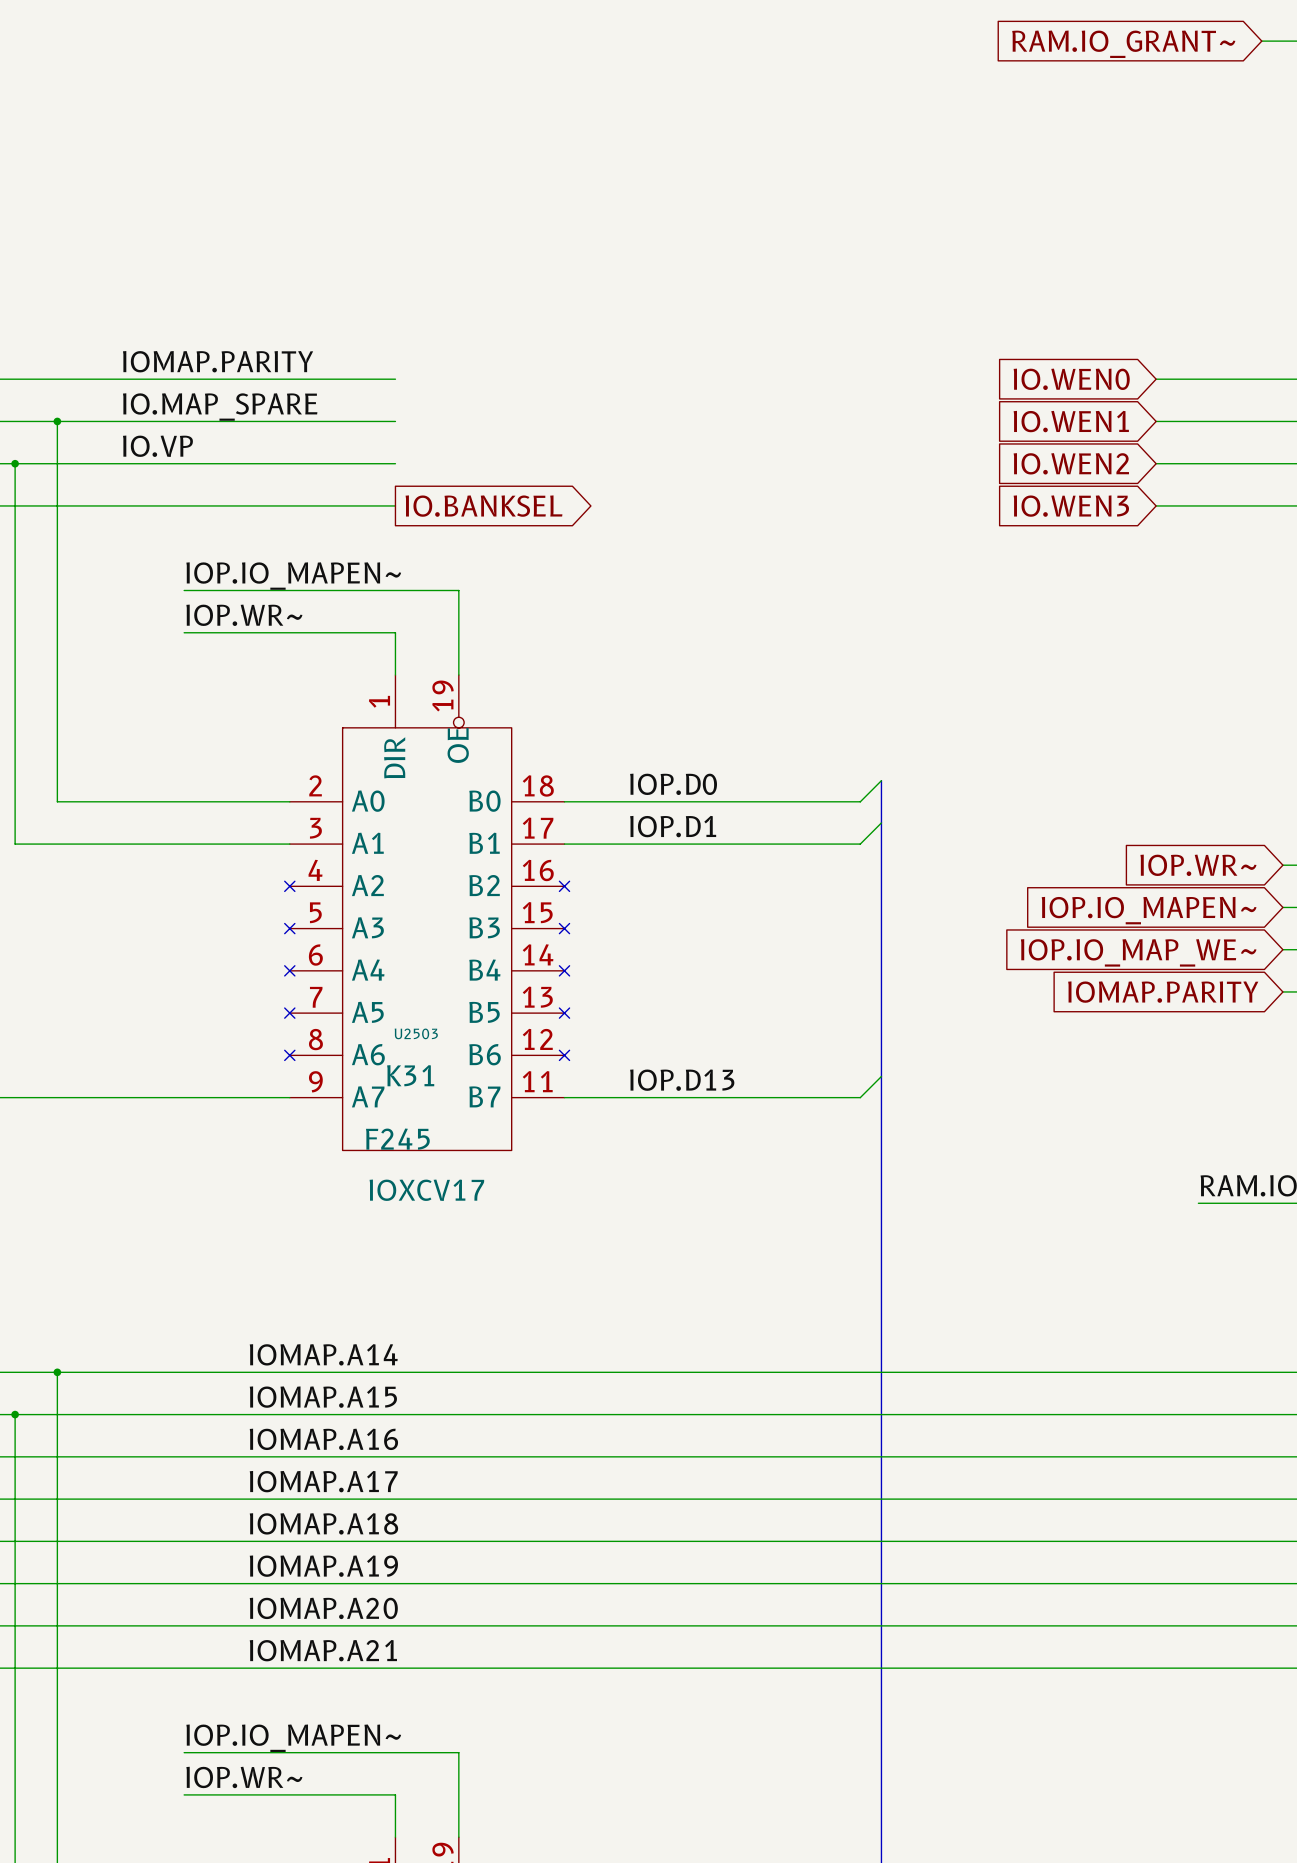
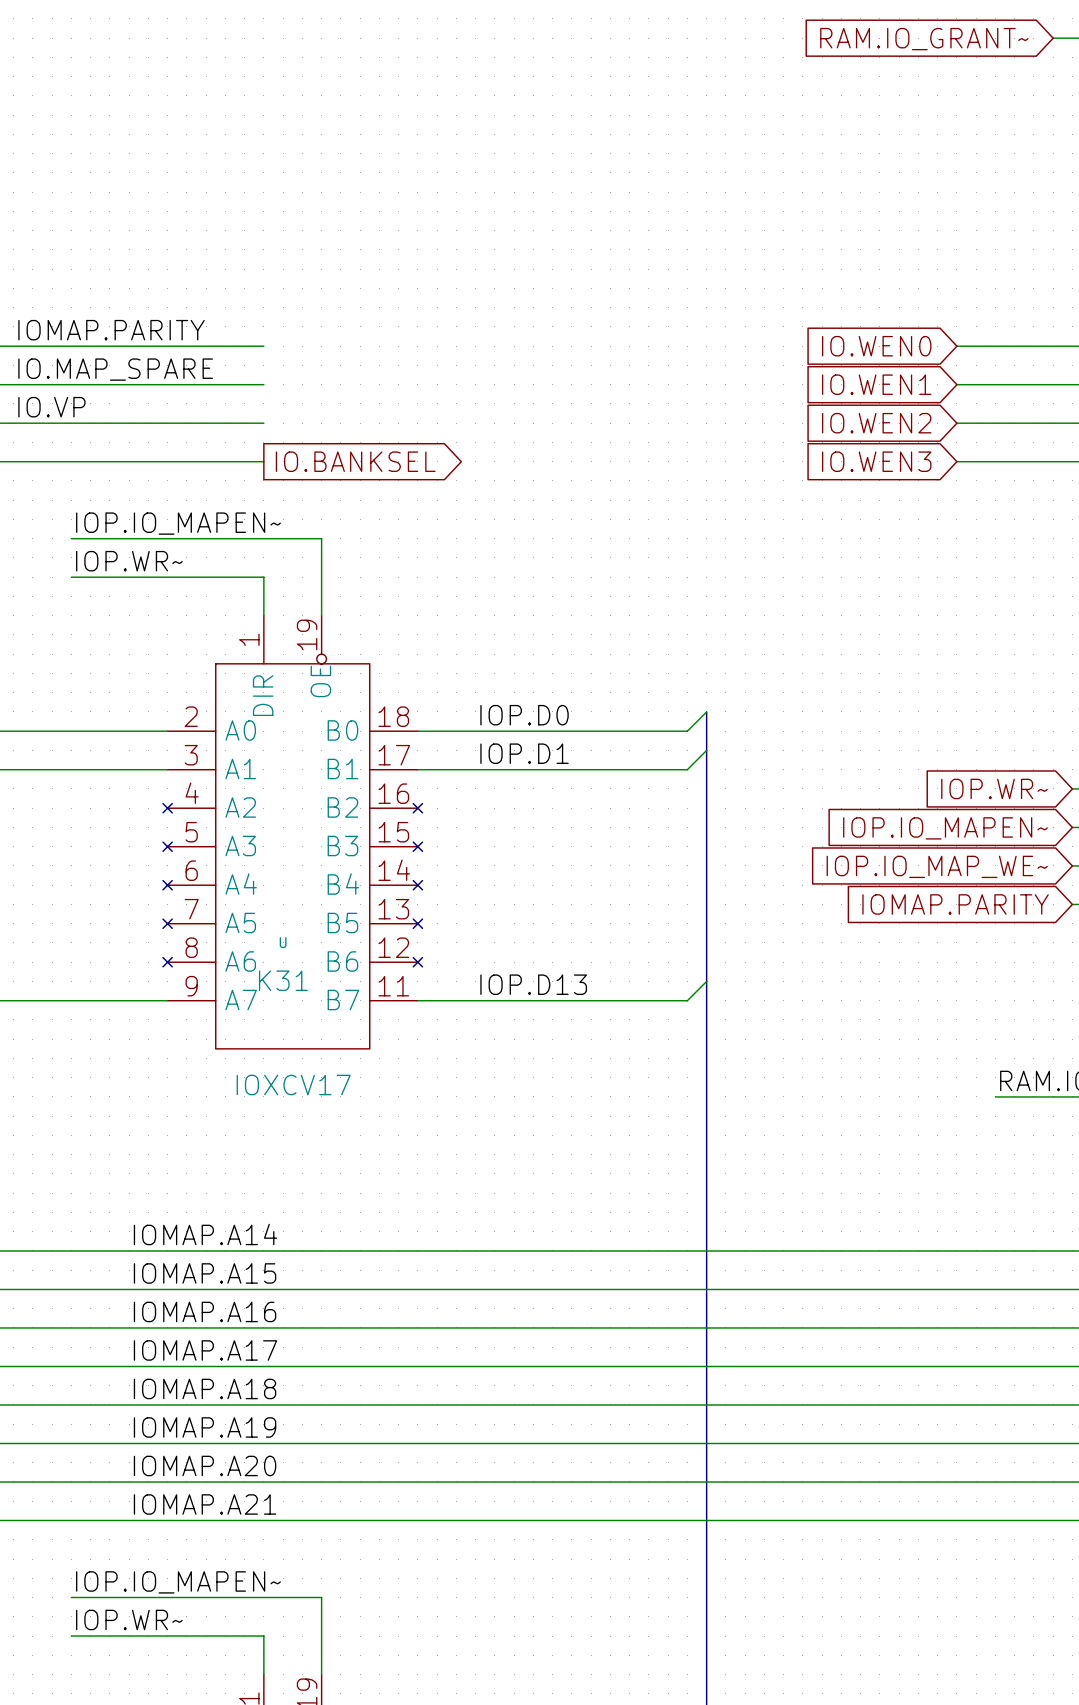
U2503 name: U2503 (416, 1033) -> U (283, 942)
U2503 value: F245 (397, 1139) -> none

